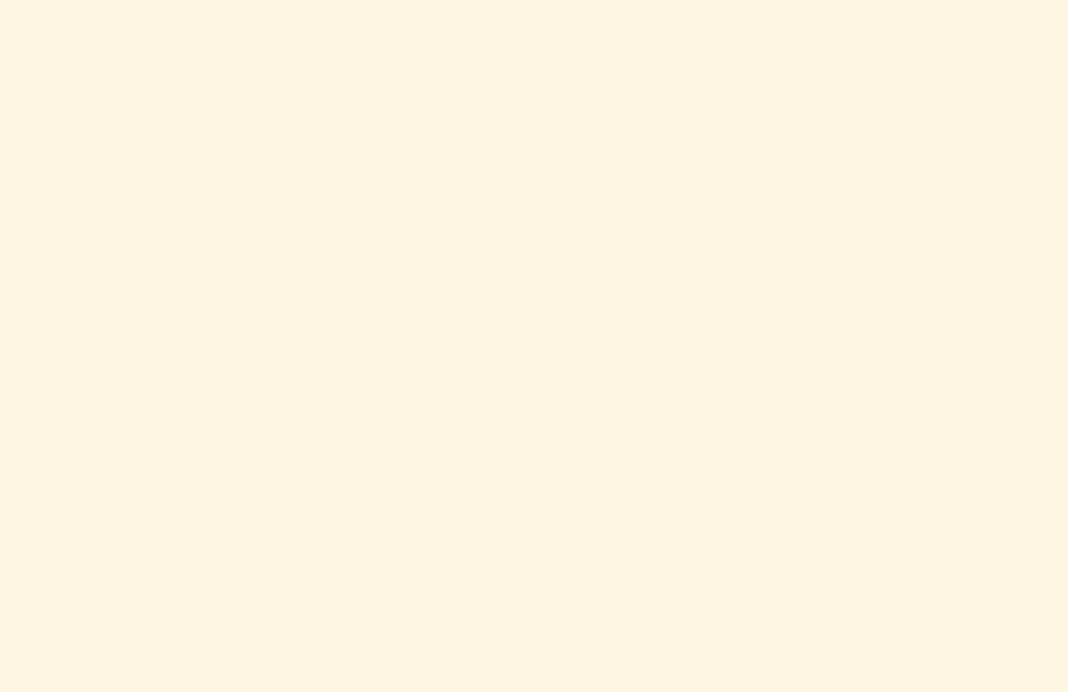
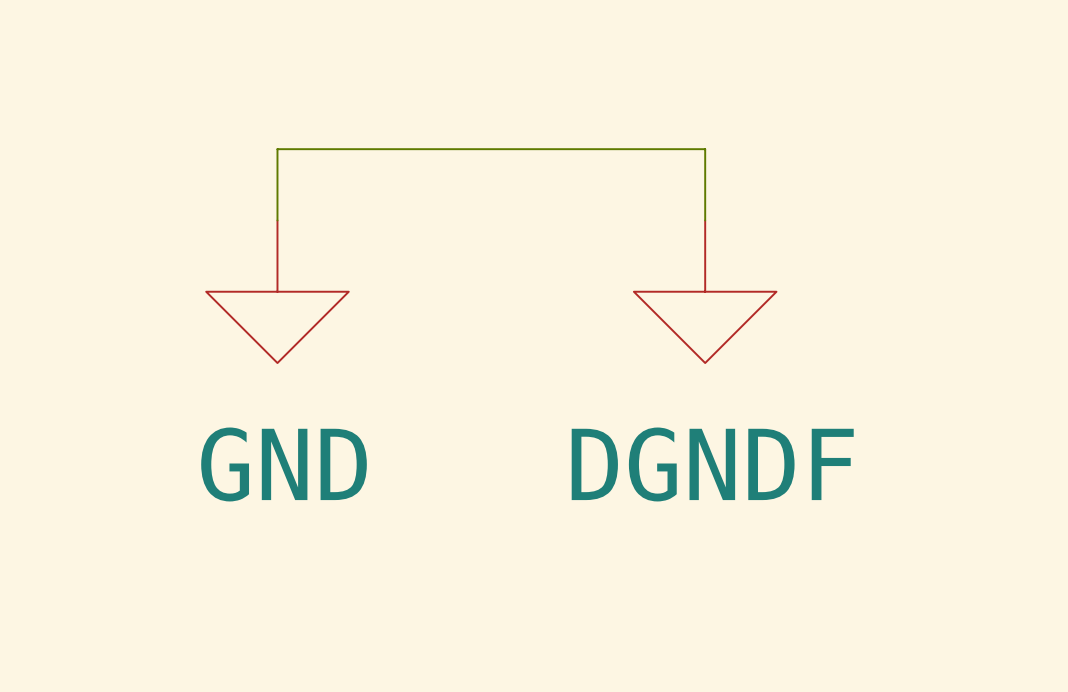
wire: none -> (277, 220) (277, 149) (705, 149) (705, 220)
power symbol: none -> GND (277, 291)
power symbol: none -> DGNDF (705, 291)

